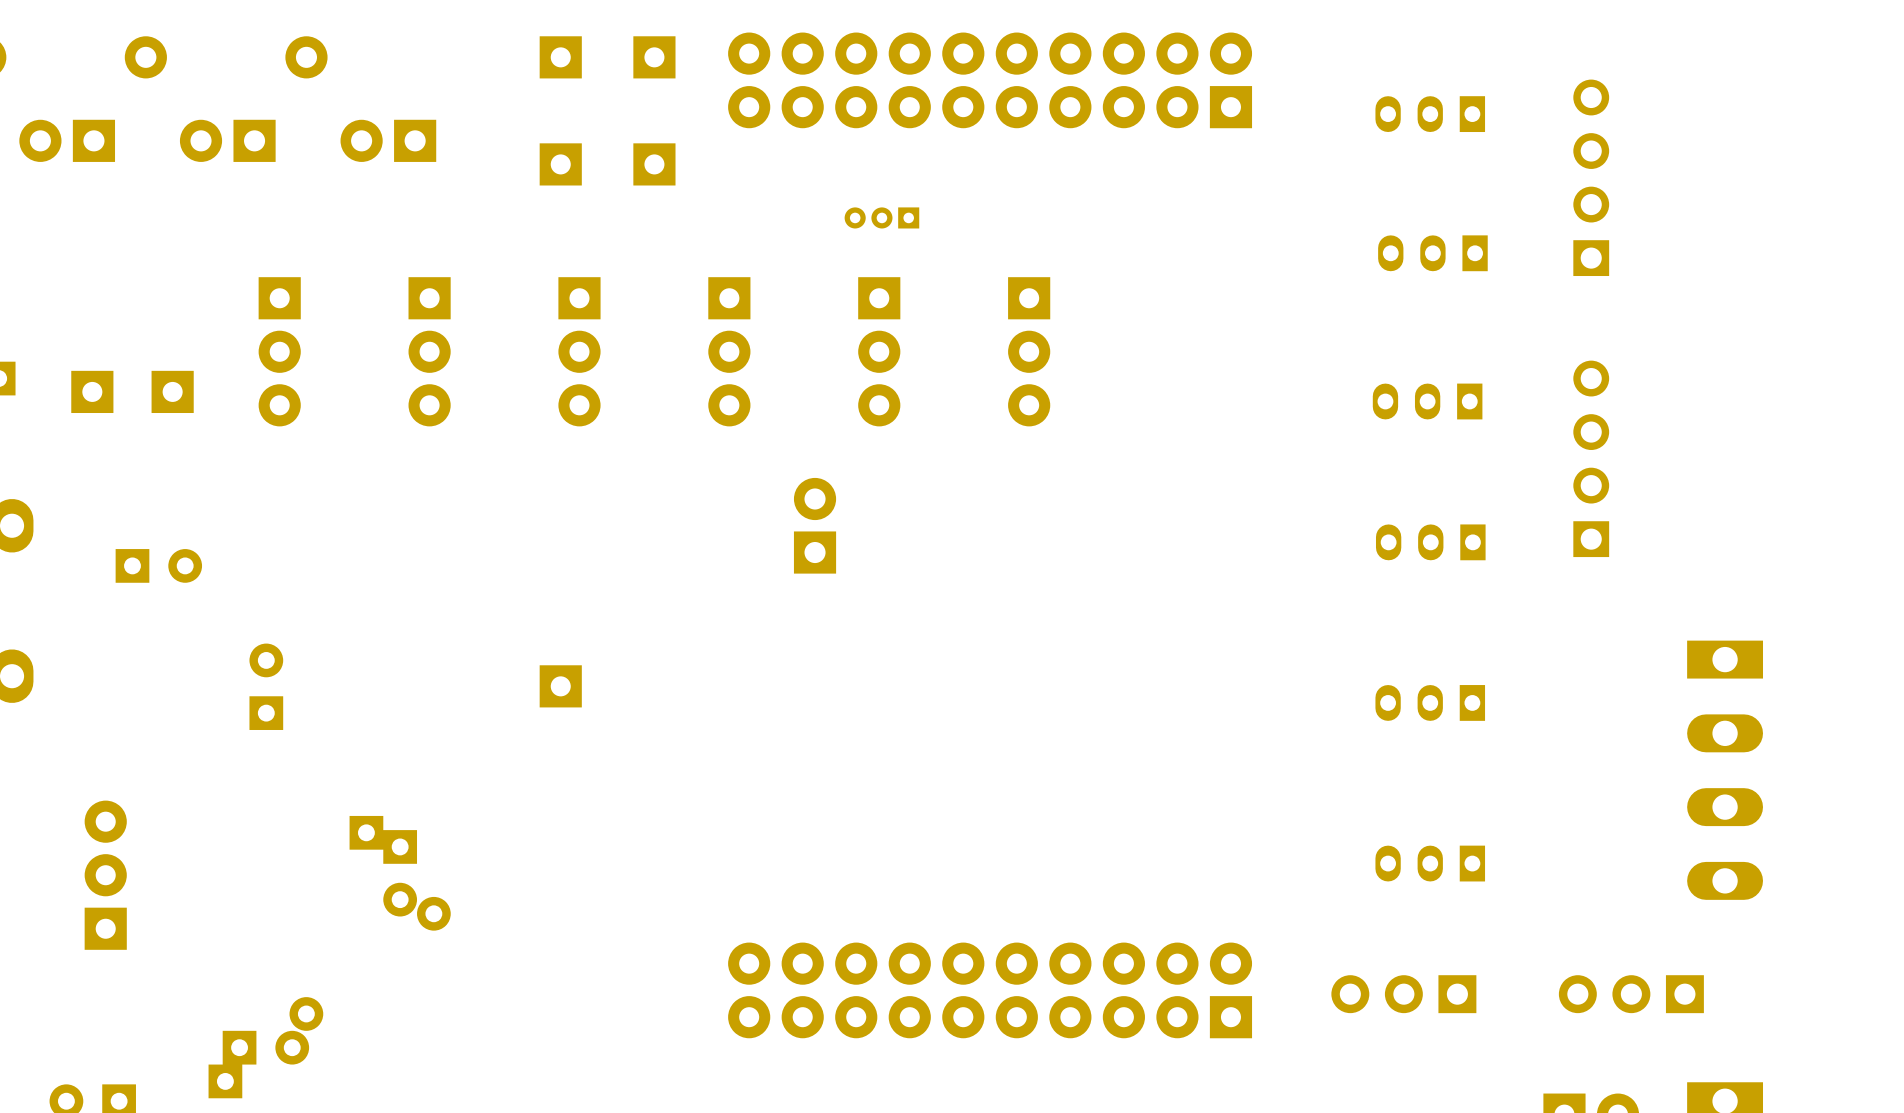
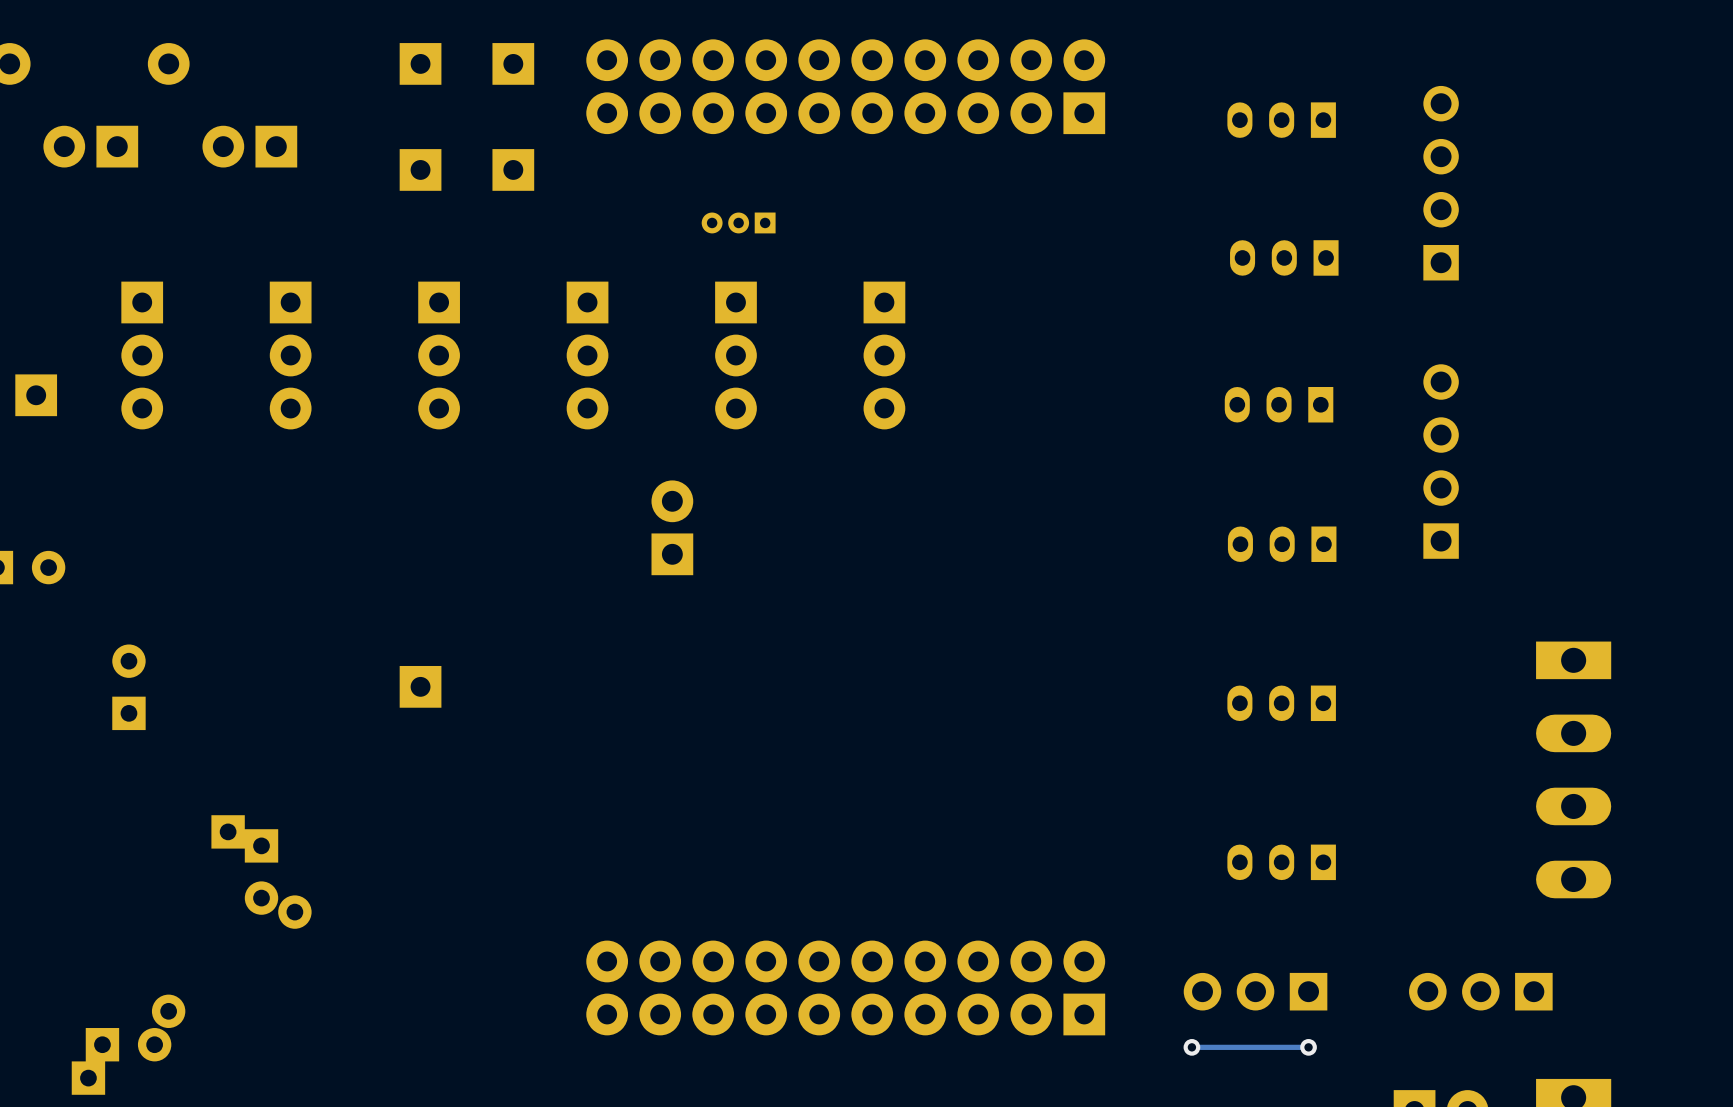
via: none -> (1191, 1047)
track: none -> (1308, 1047) (1189, 1047)
via: none -> (1308, 1047)

